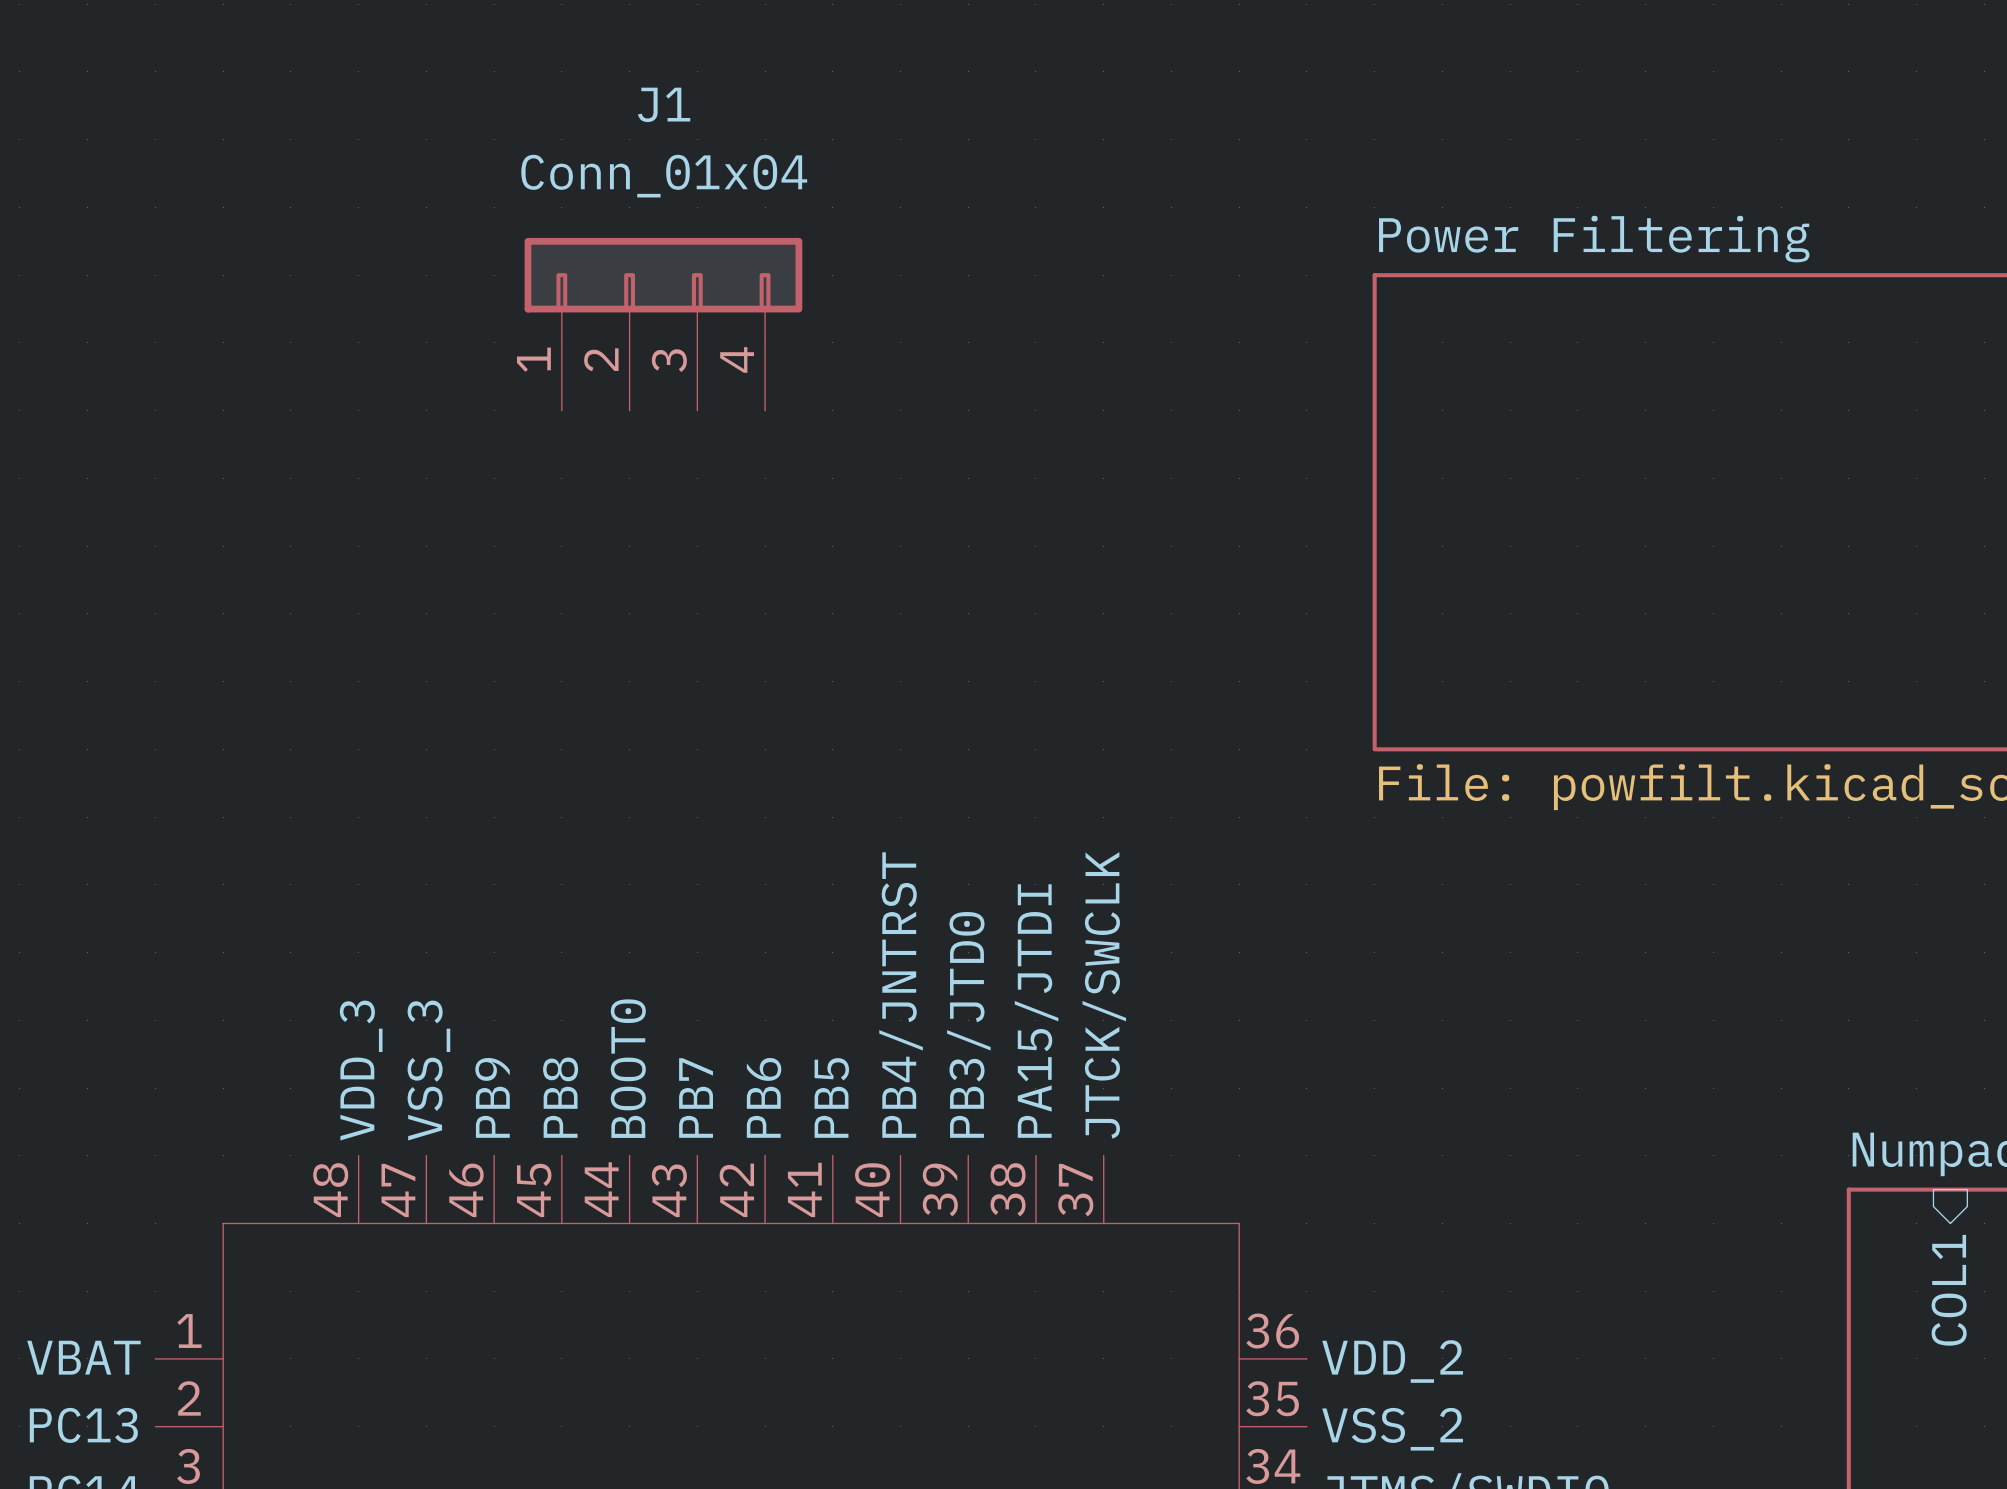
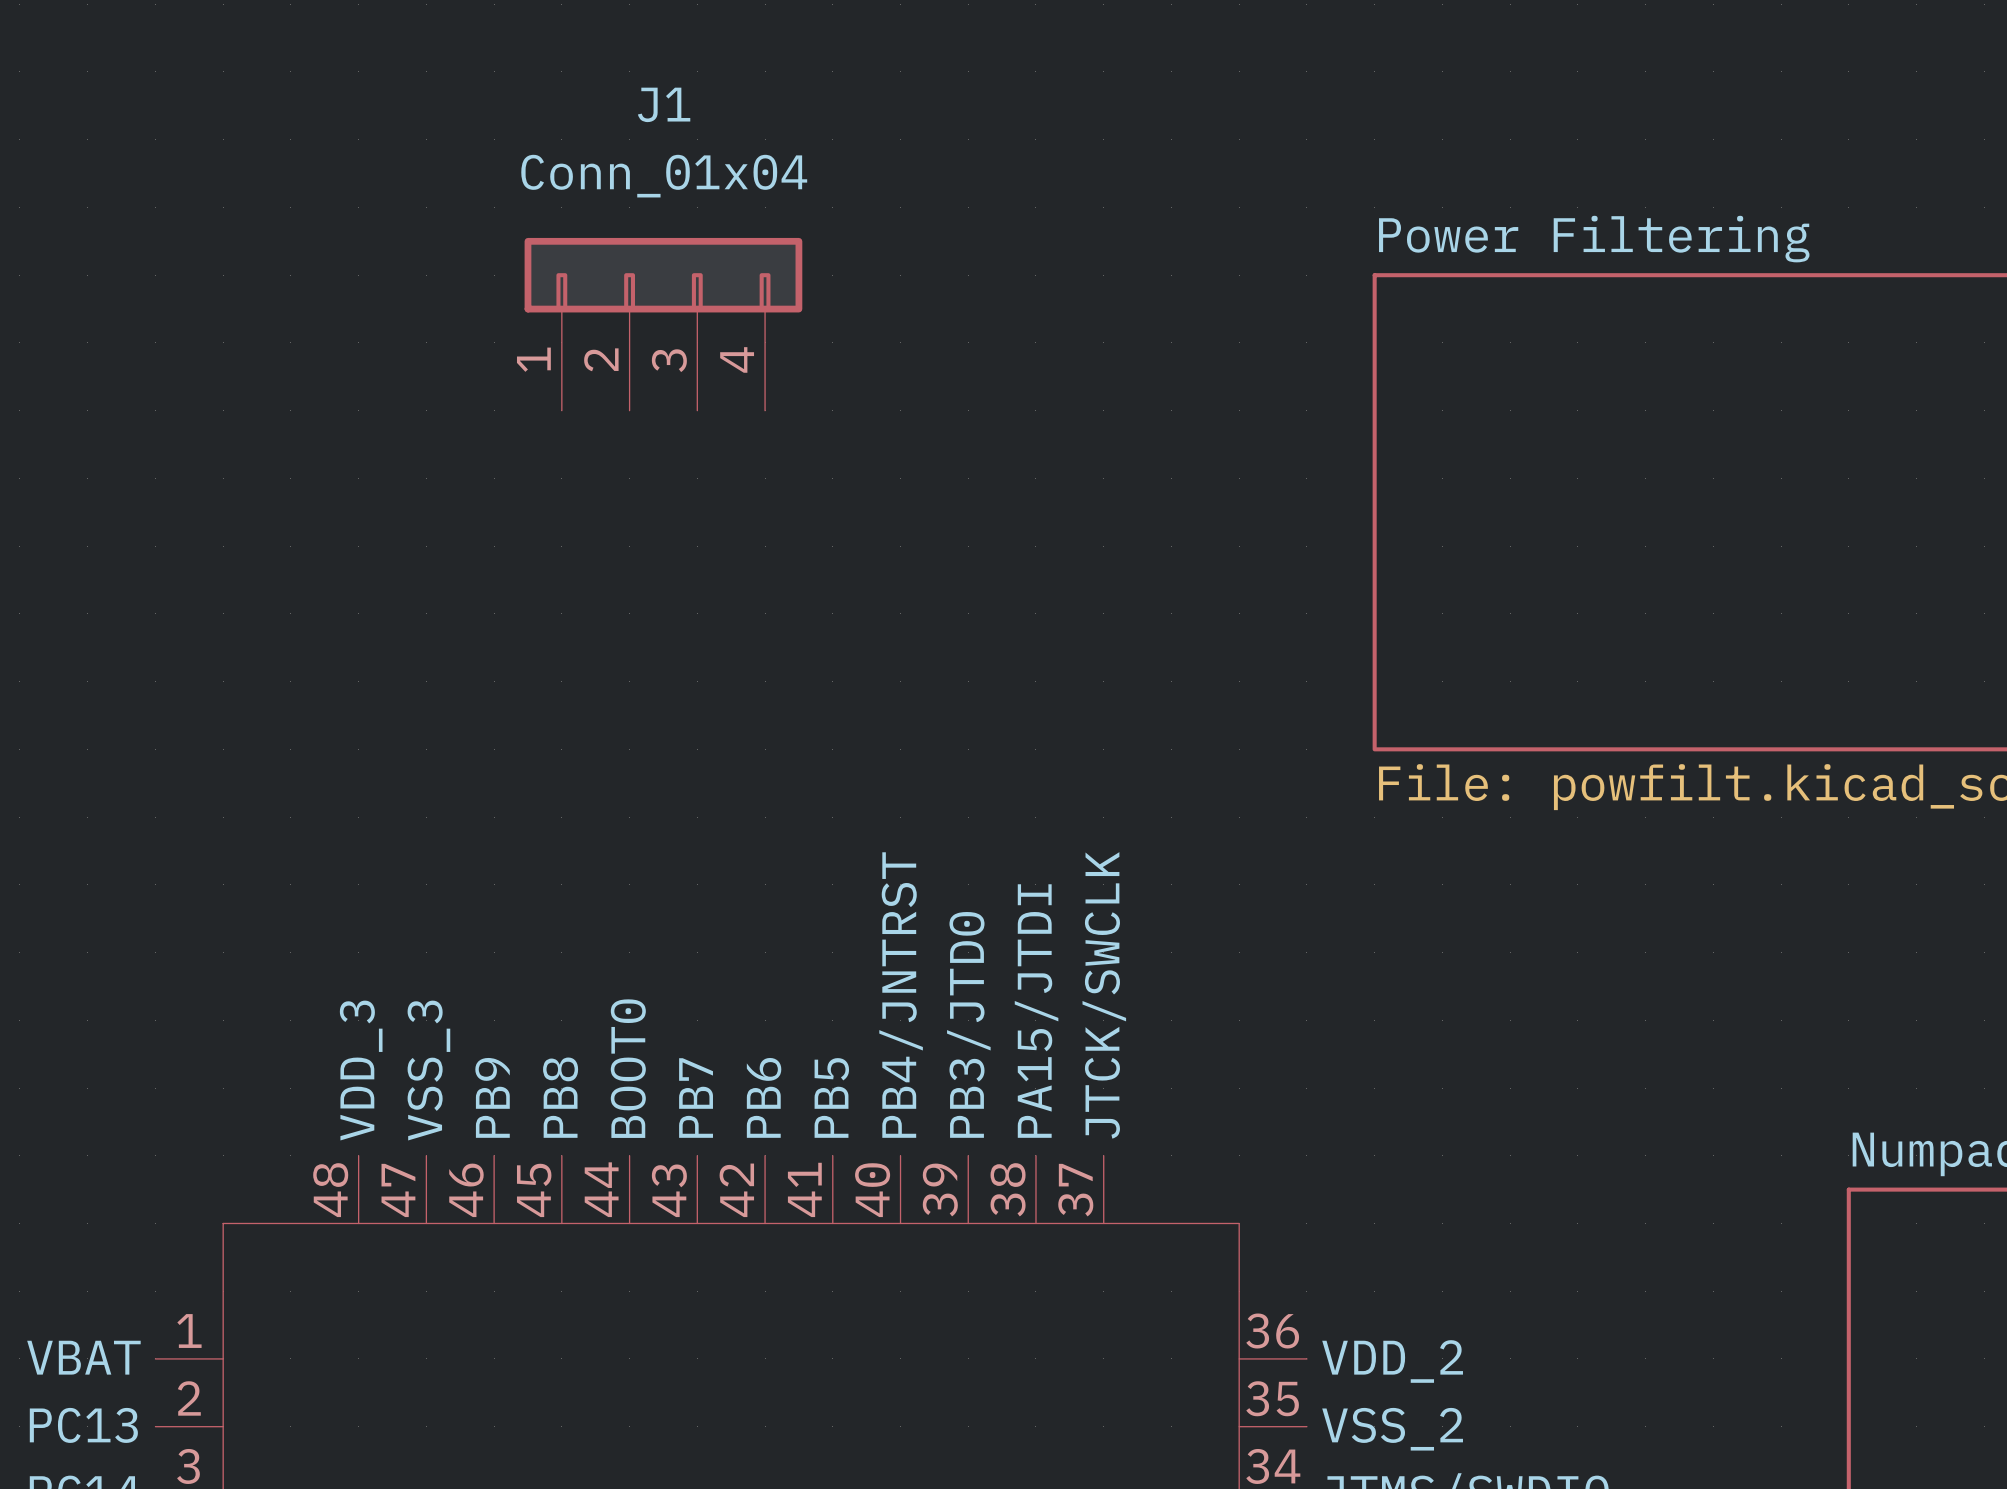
sheet pin: COL1 (1949, 1290) -> none

